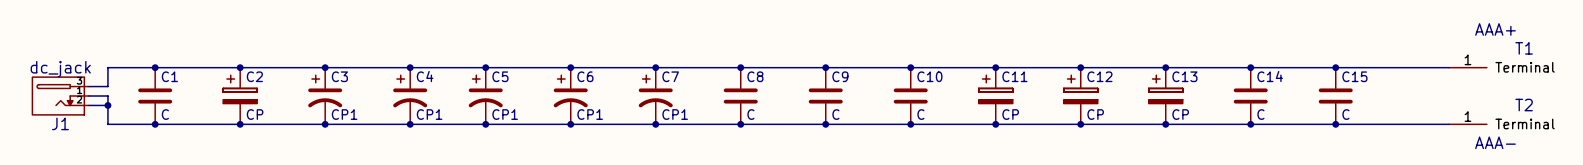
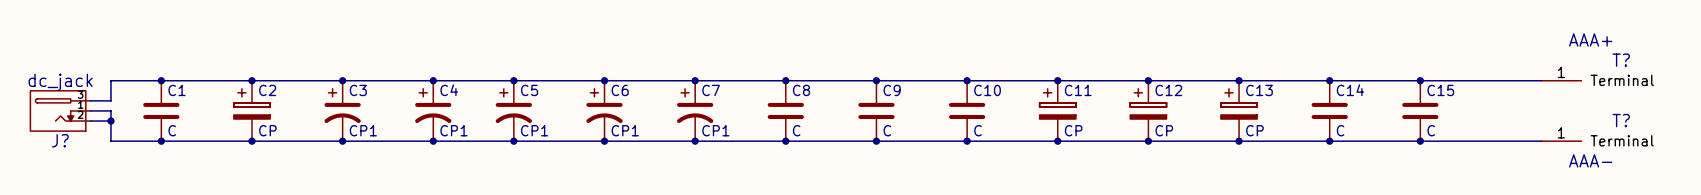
T1 name: T1 (1524, 48) -> T? (1621, 60)
T2 name: T2 (1524, 105) -> T? (1621, 120)
J1 name: J1 (60, 123) -> J? (60, 140)

